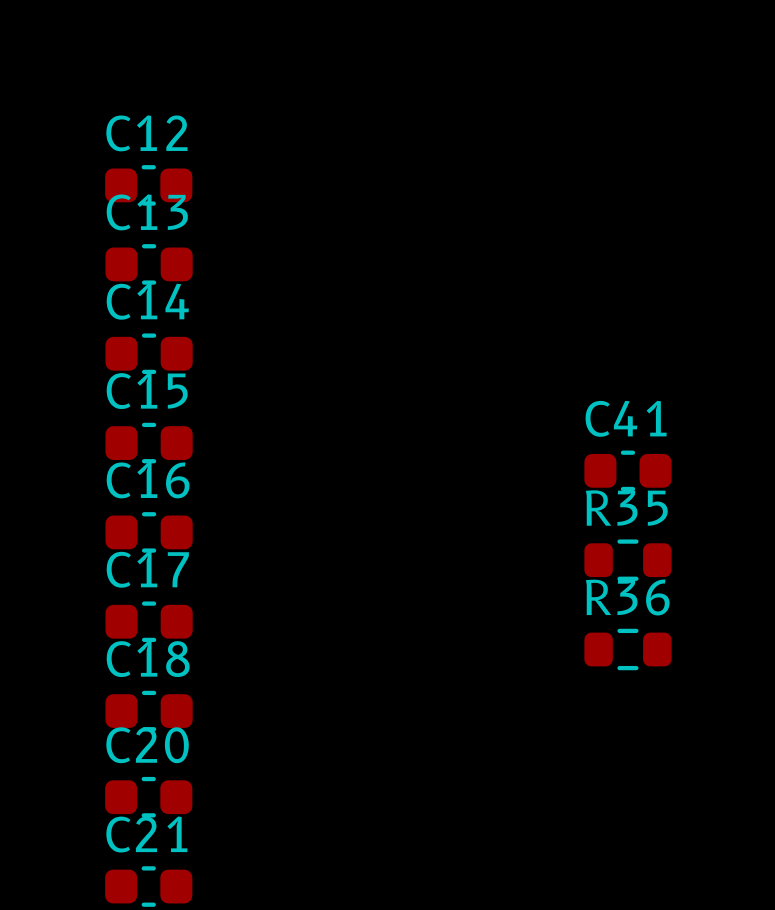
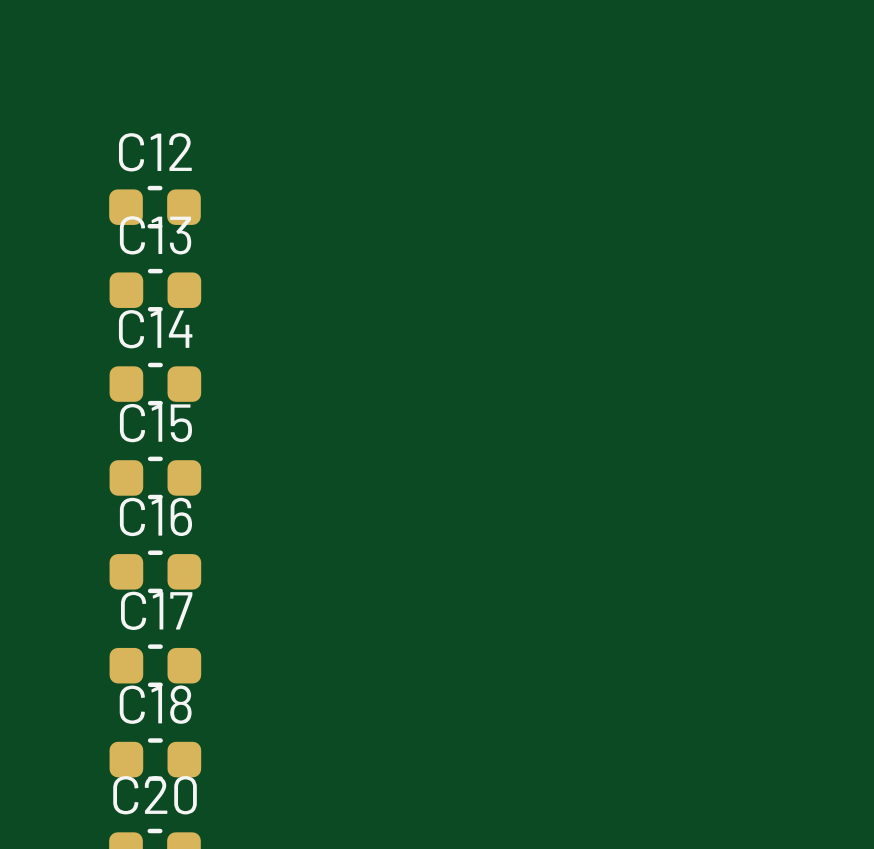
C41: (627, 470) -> none
R35: (627, 560) -> none
R36: (627, 649) -> none

